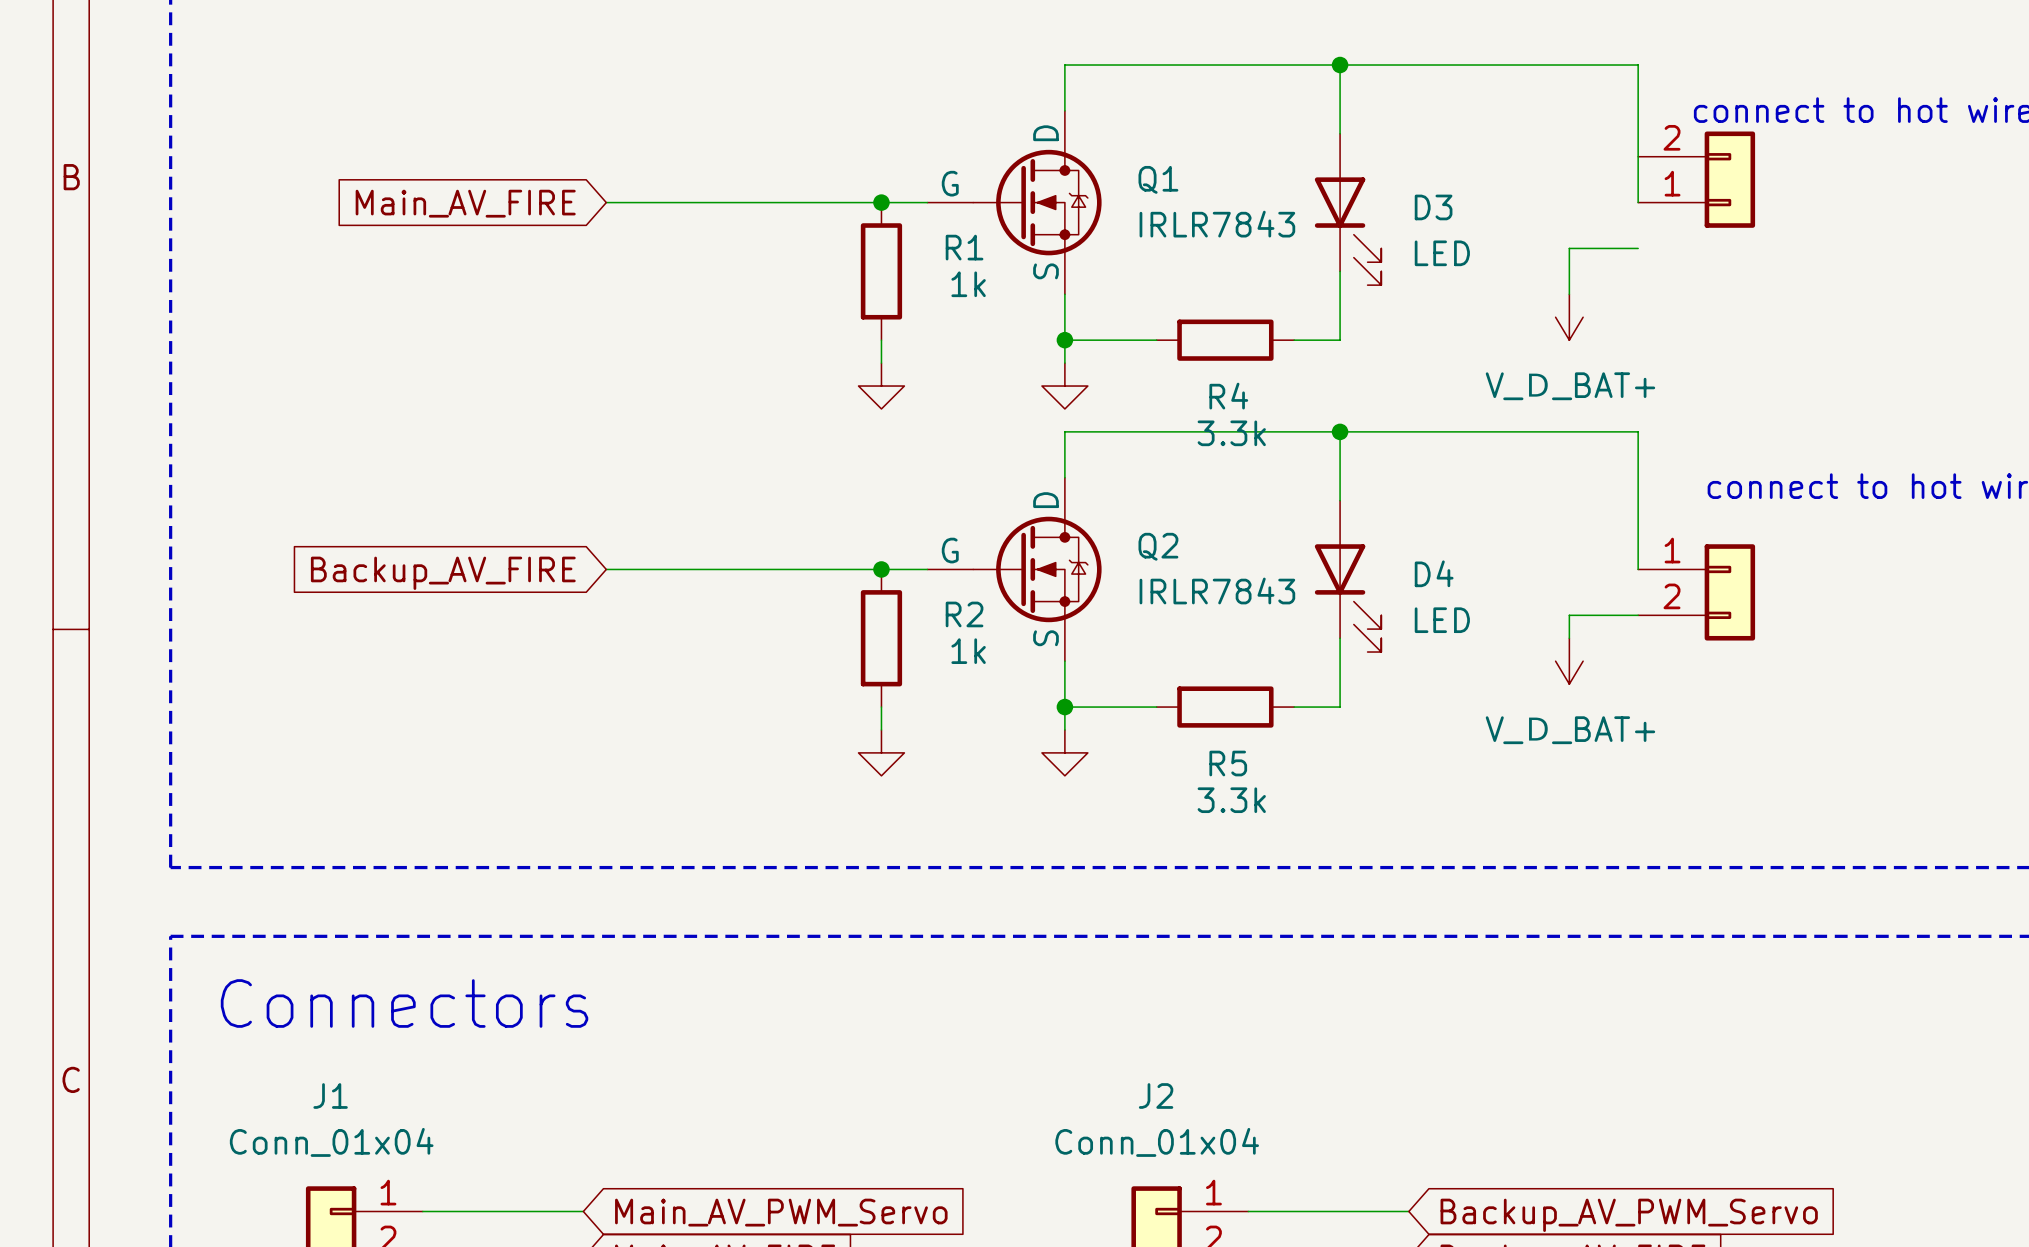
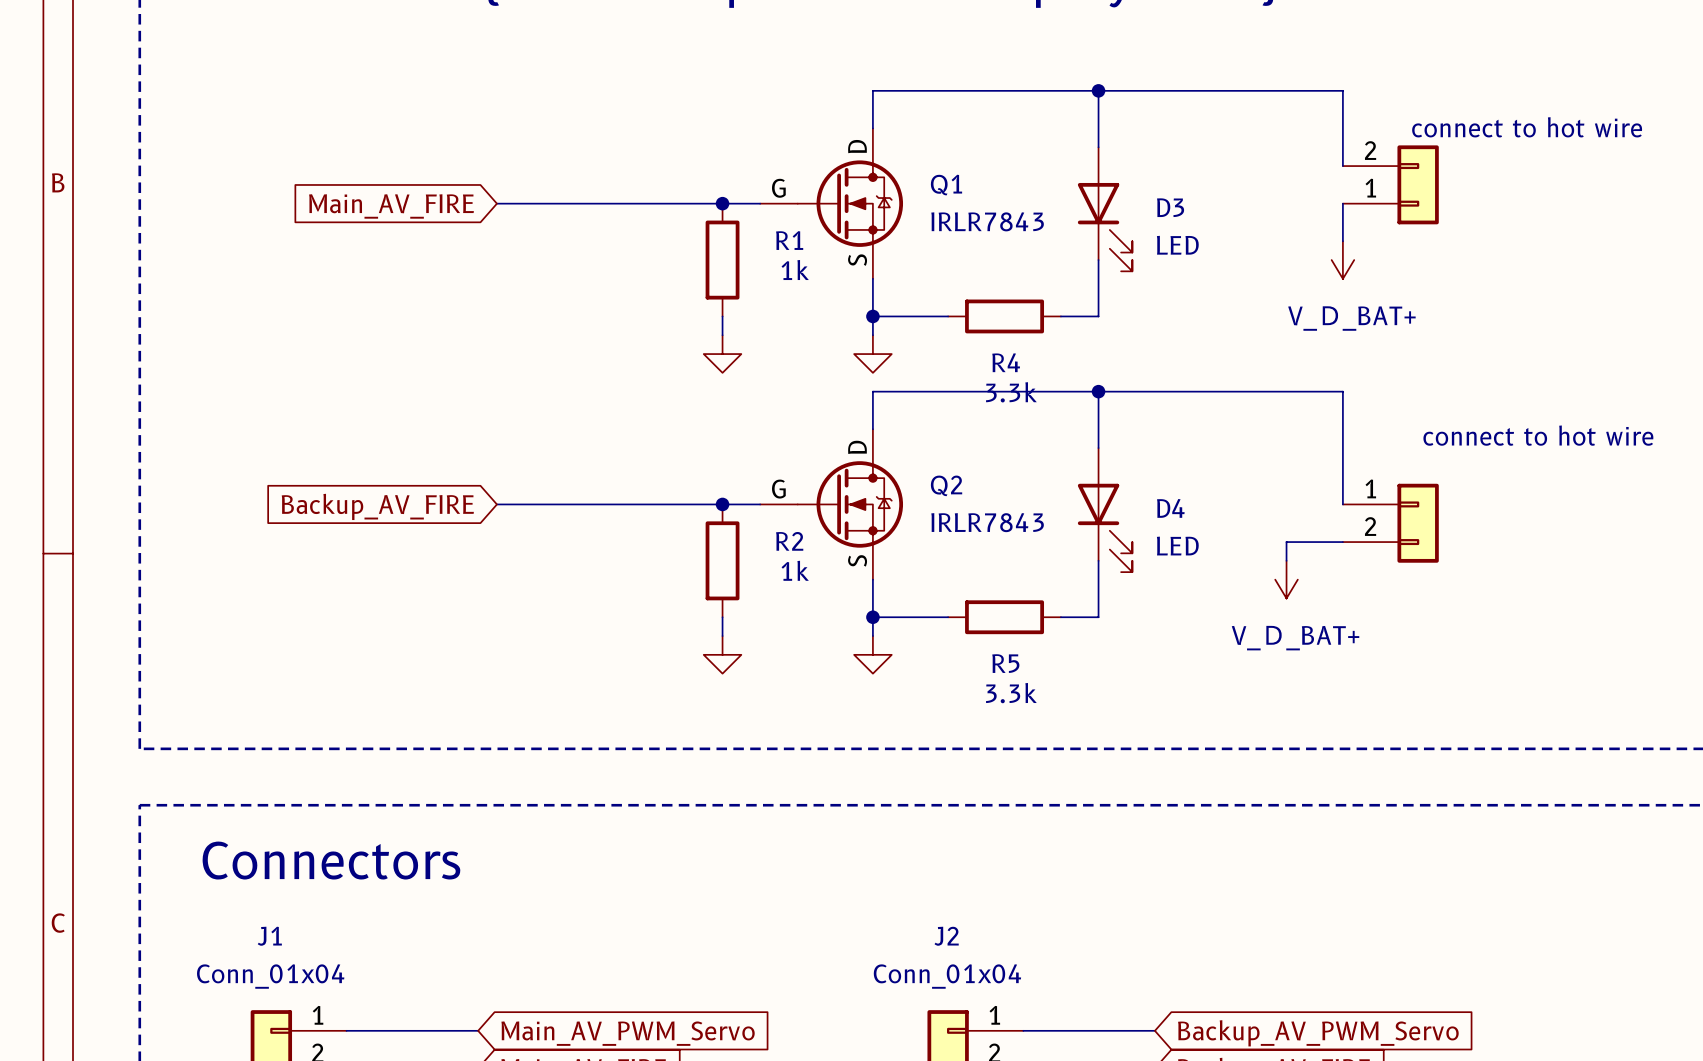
wire: (1638, 156) (1638, 202) -> (1342, 241) (1342, 203)
wire: (1638, 248) (1569, 248) (1569, 294) -> none
power symbol position: V_Ｄ_BAT+ (1569, 317) -> V_Ｄ_BAT+ (1342, 260)

